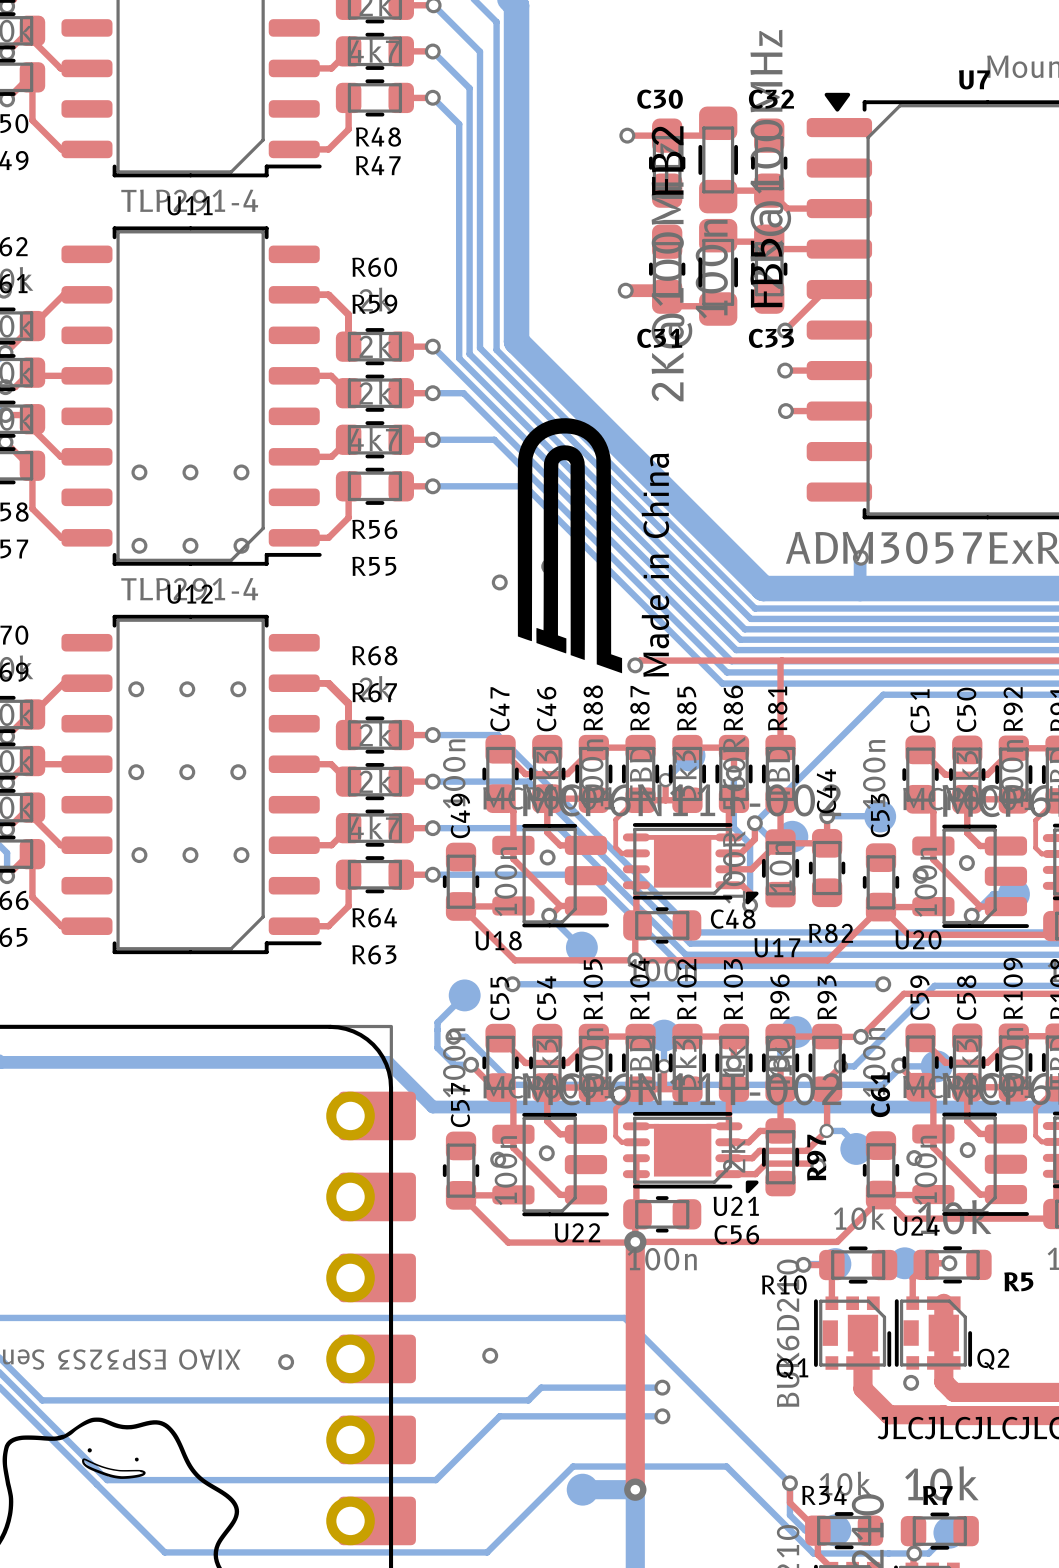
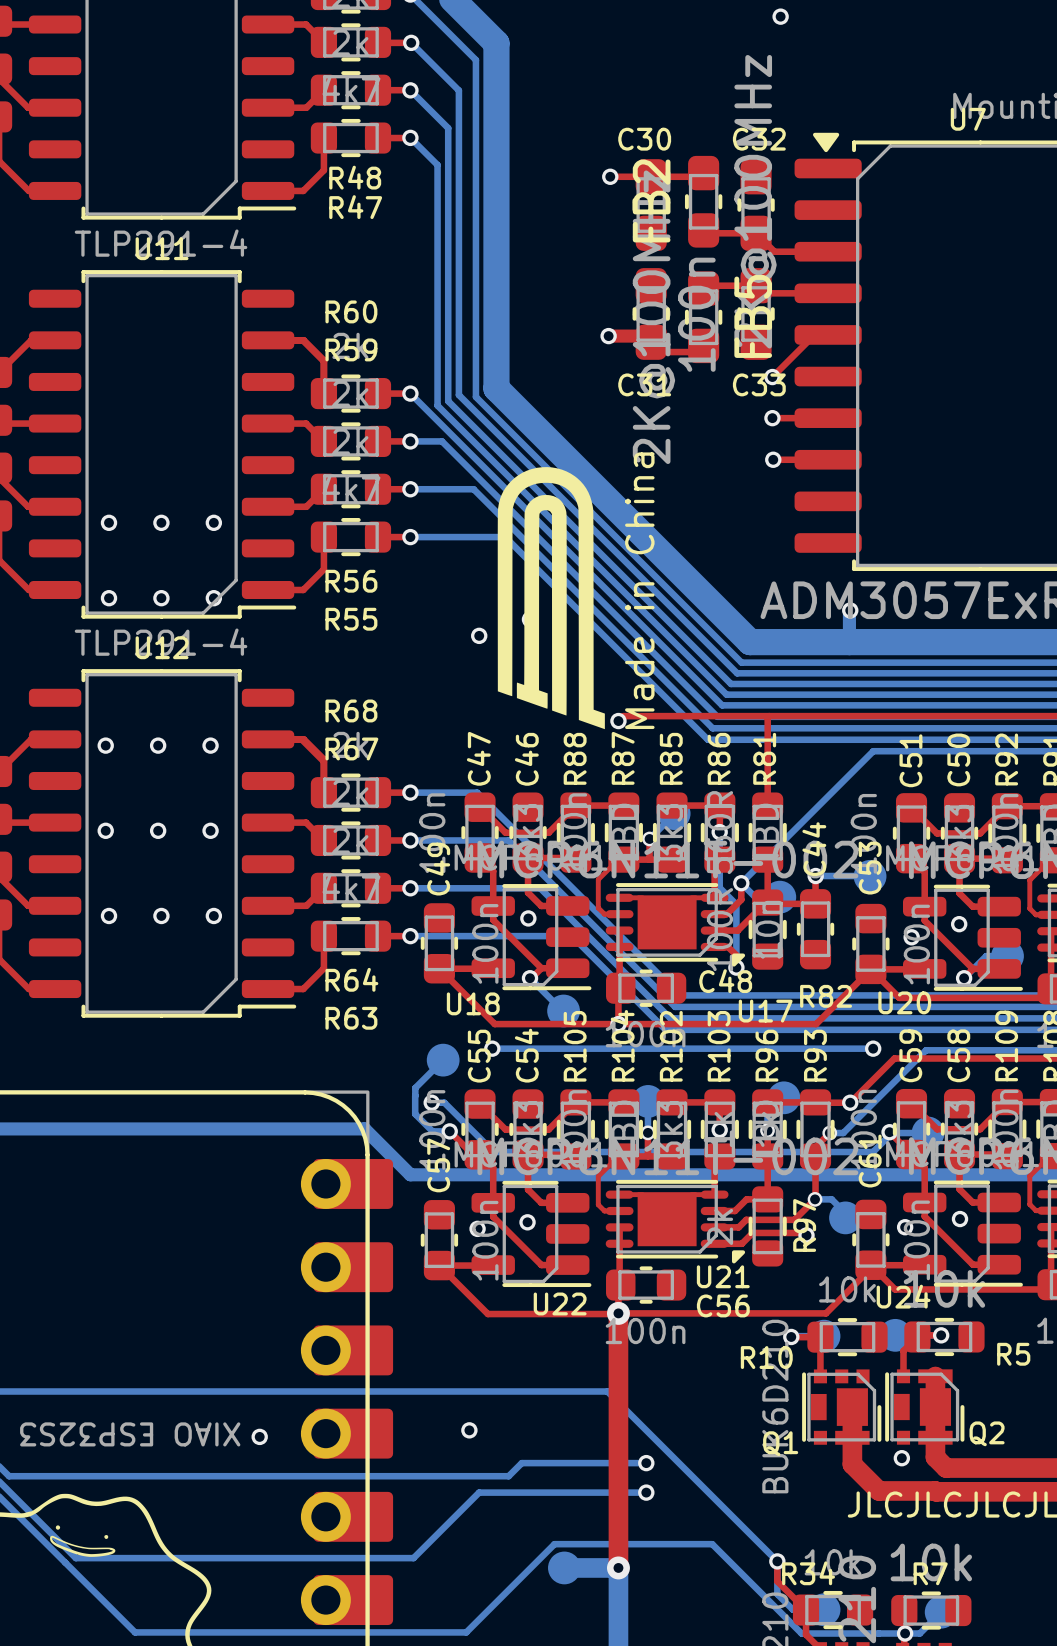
FB2 footprint: [698, 106, 738, 214] -> [684, 155, 723, 248]
FB5 footprint: [698, 218, 738, 326] -> [684, 271, 723, 364]

